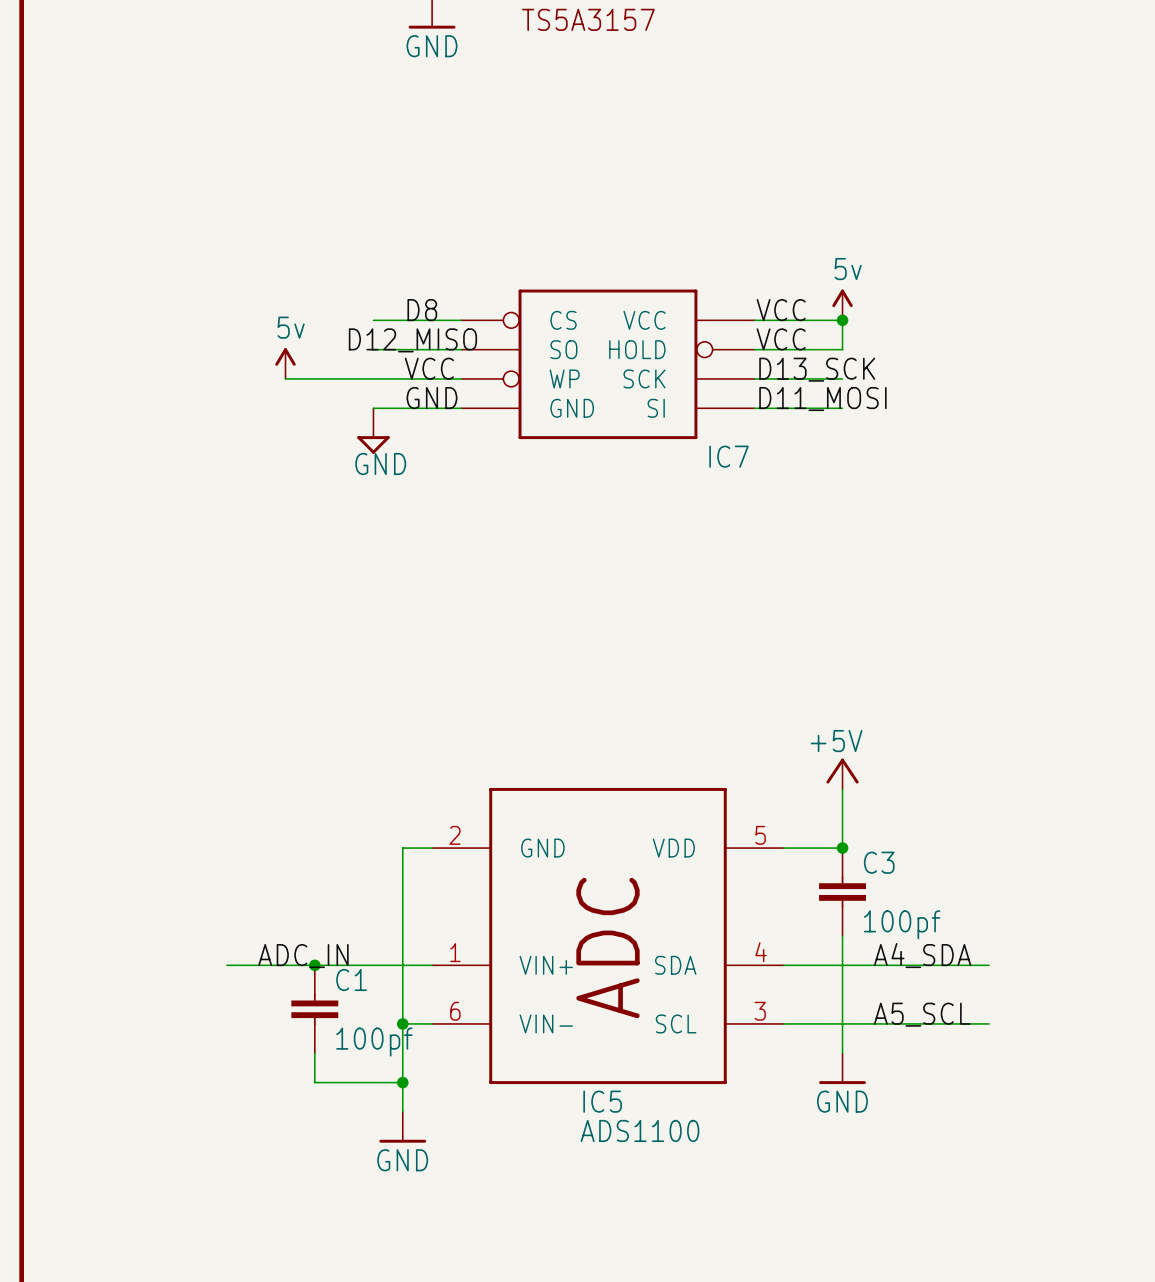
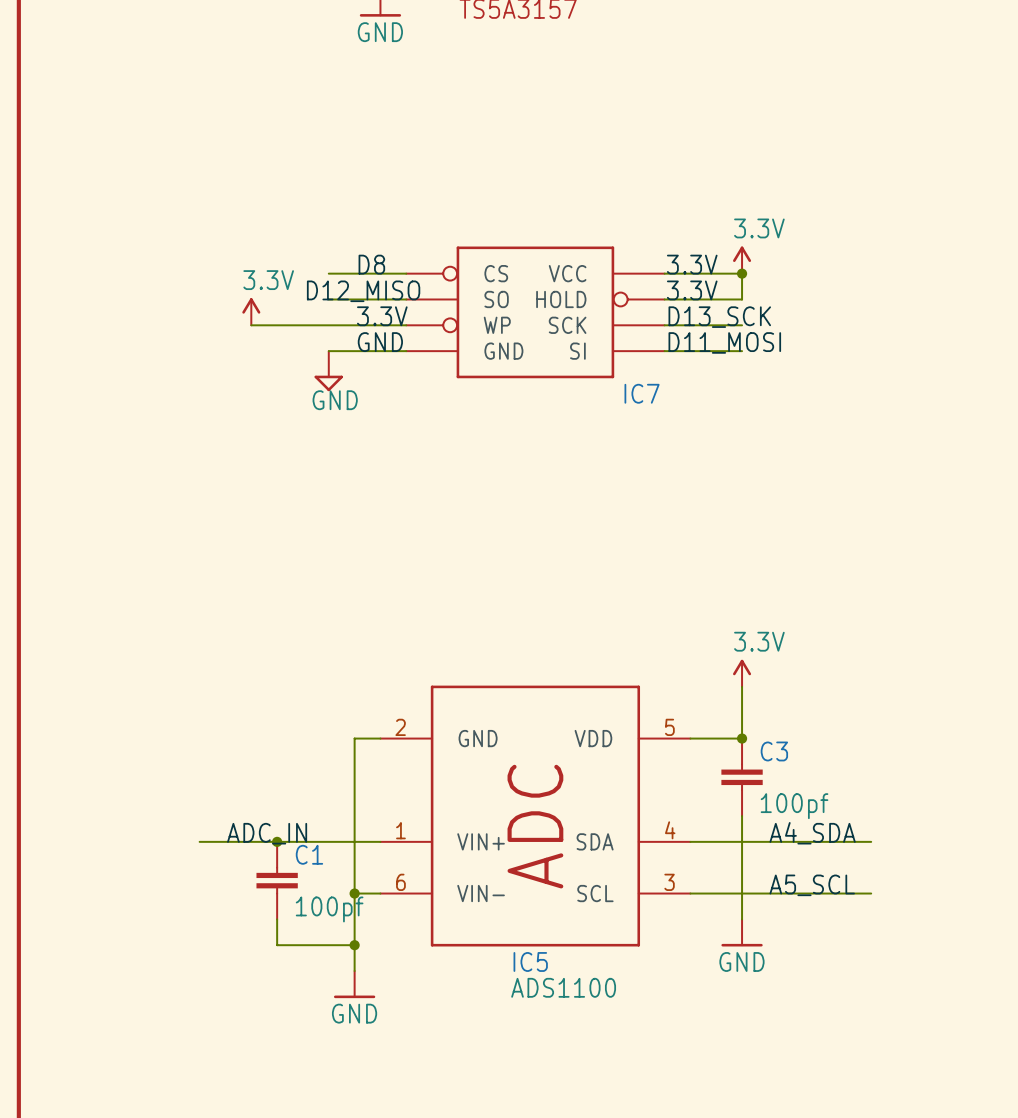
power symbol: 5v (842, 304) -> 3.3V (742, 260)
label: VCC (781, 310) -> 3.3V (692, 264)
label: VCC (781, 339) -> 3.3V (692, 290)
power symbol: 5v (285, 363) -> 3.3V (251, 311)
label: VCC (429, 368) -> 3.3V (382, 316)
power symbol: +5V (842, 774) -> 3.3V (742, 673)

